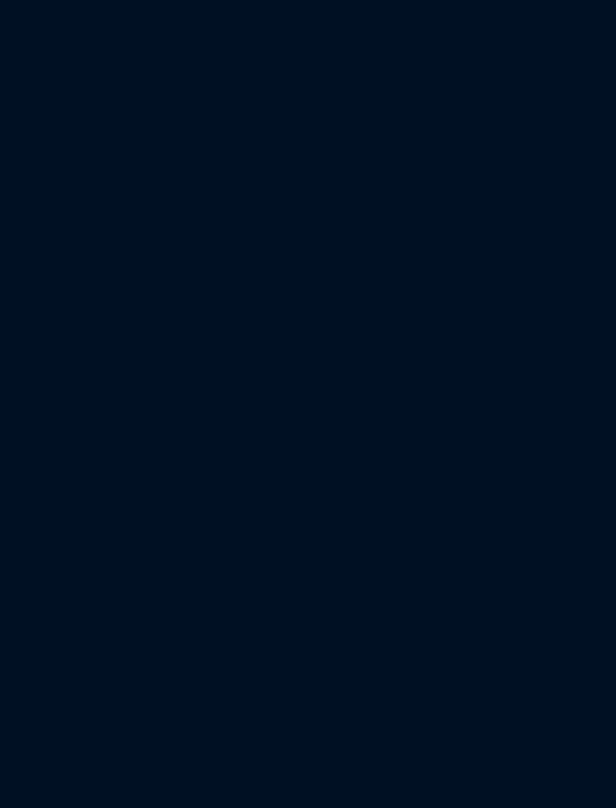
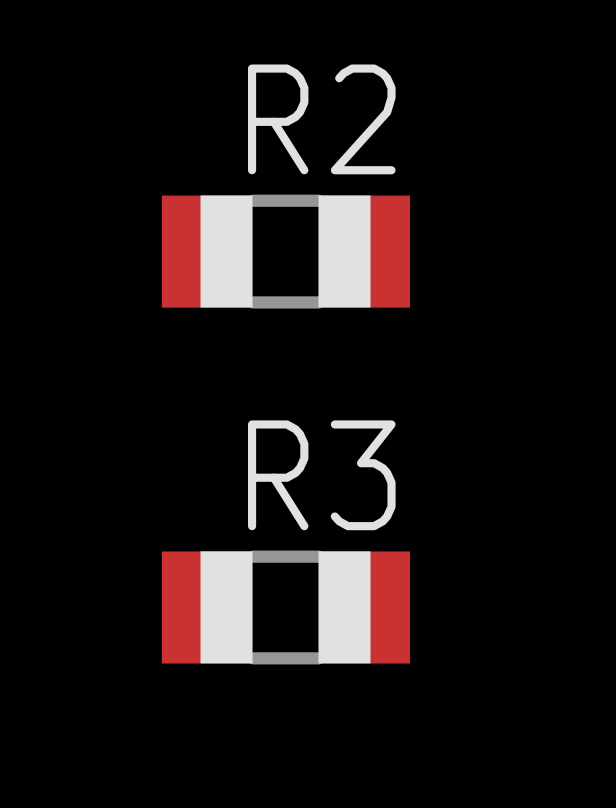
R2: none -> (285, 251)
R3: none -> (285, 607)

